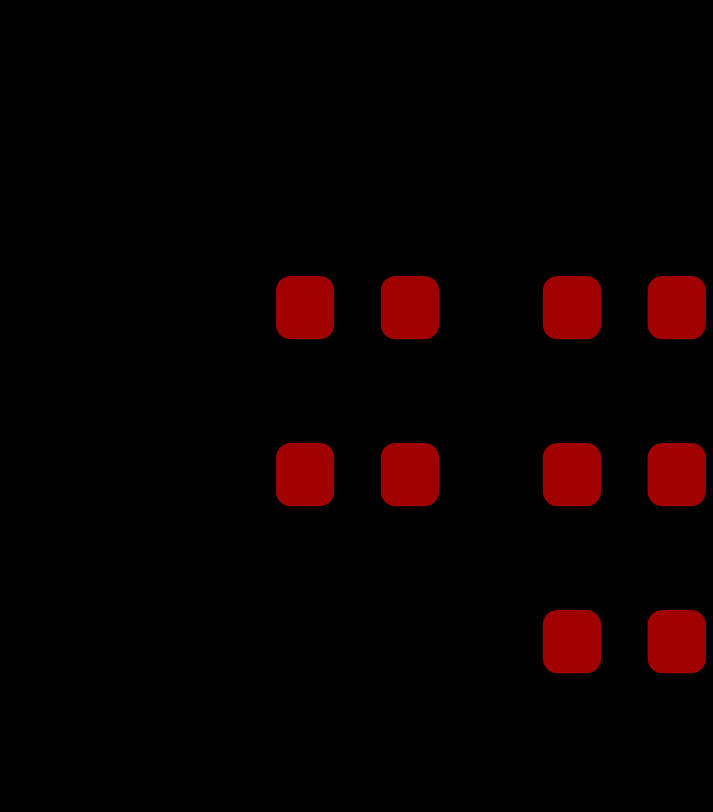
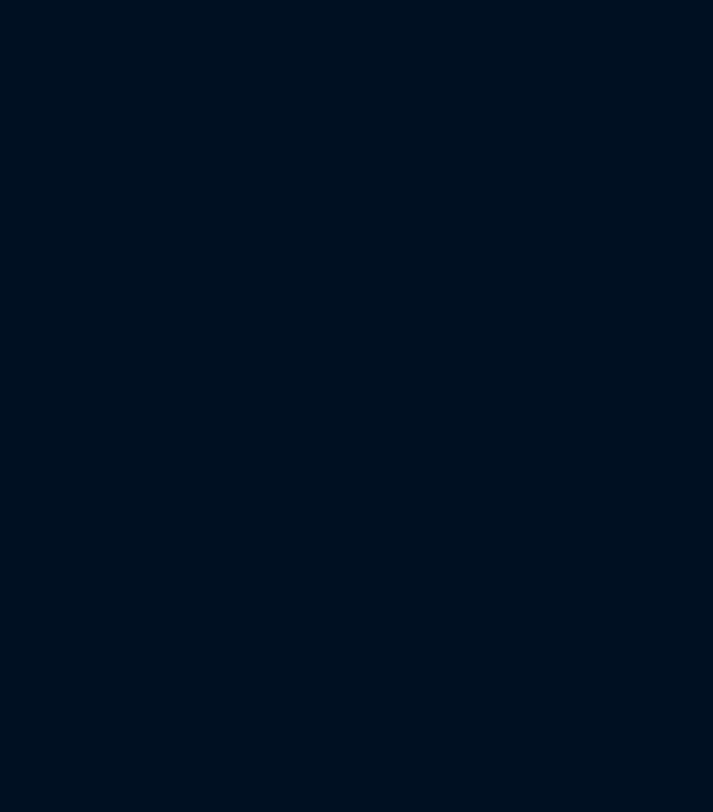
part: (357, 307) -> none
part: (624, 307) -> none
part: (357, 474) -> none
part: (624, 474) -> none
part: (624, 641) -> none

